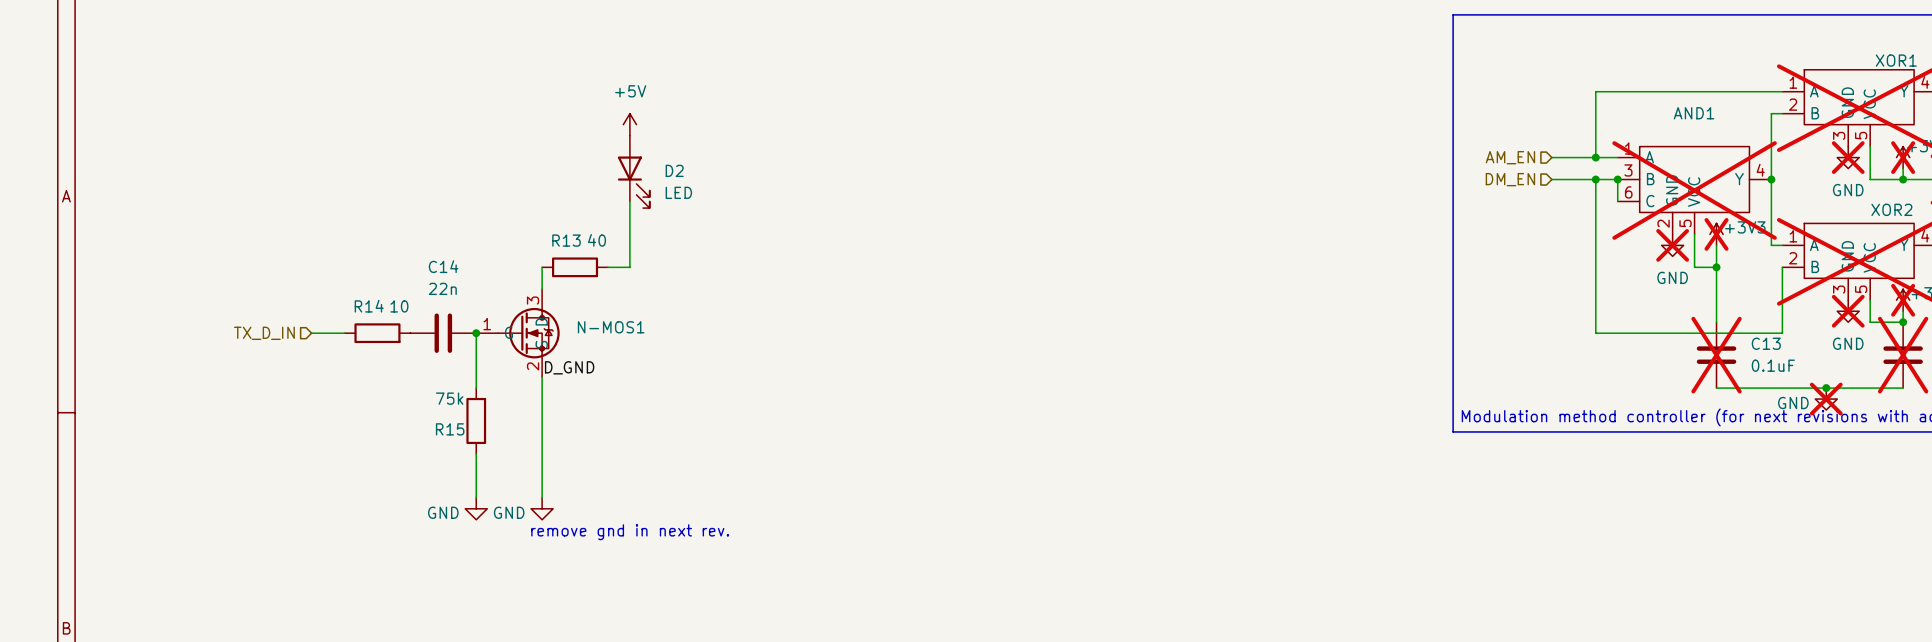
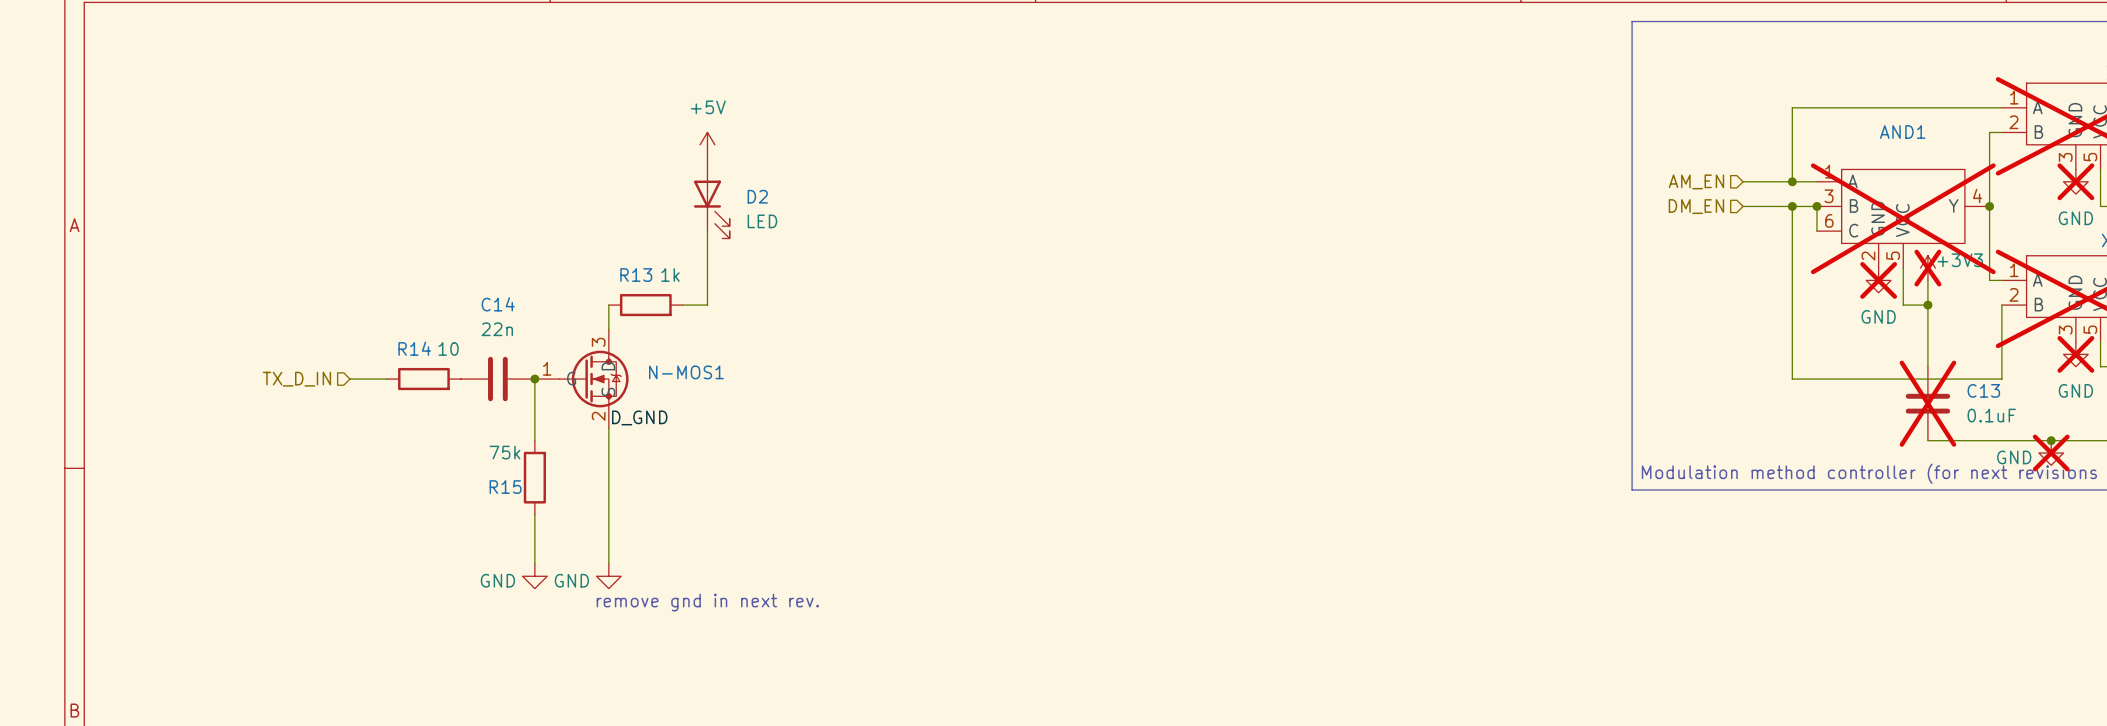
R13 value: 40 (596, 240) -> 1k (670, 275)

